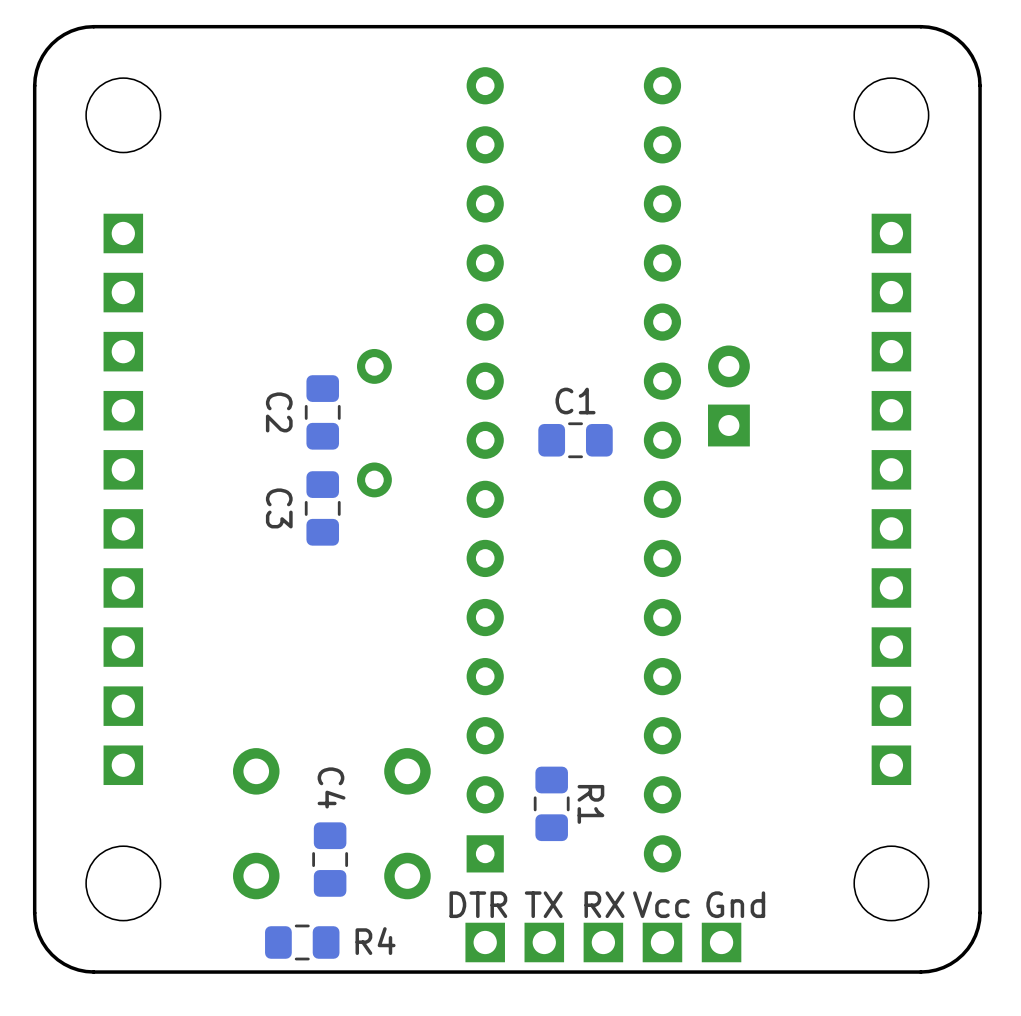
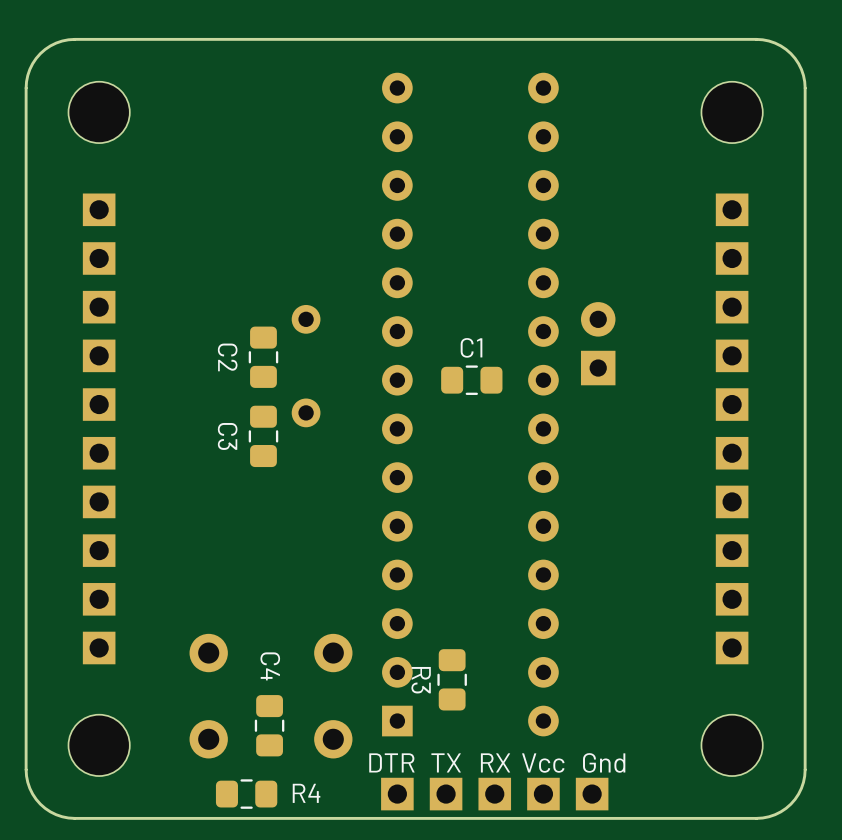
R1 name: R1 (590, 804) -> R3 (421, 680)

